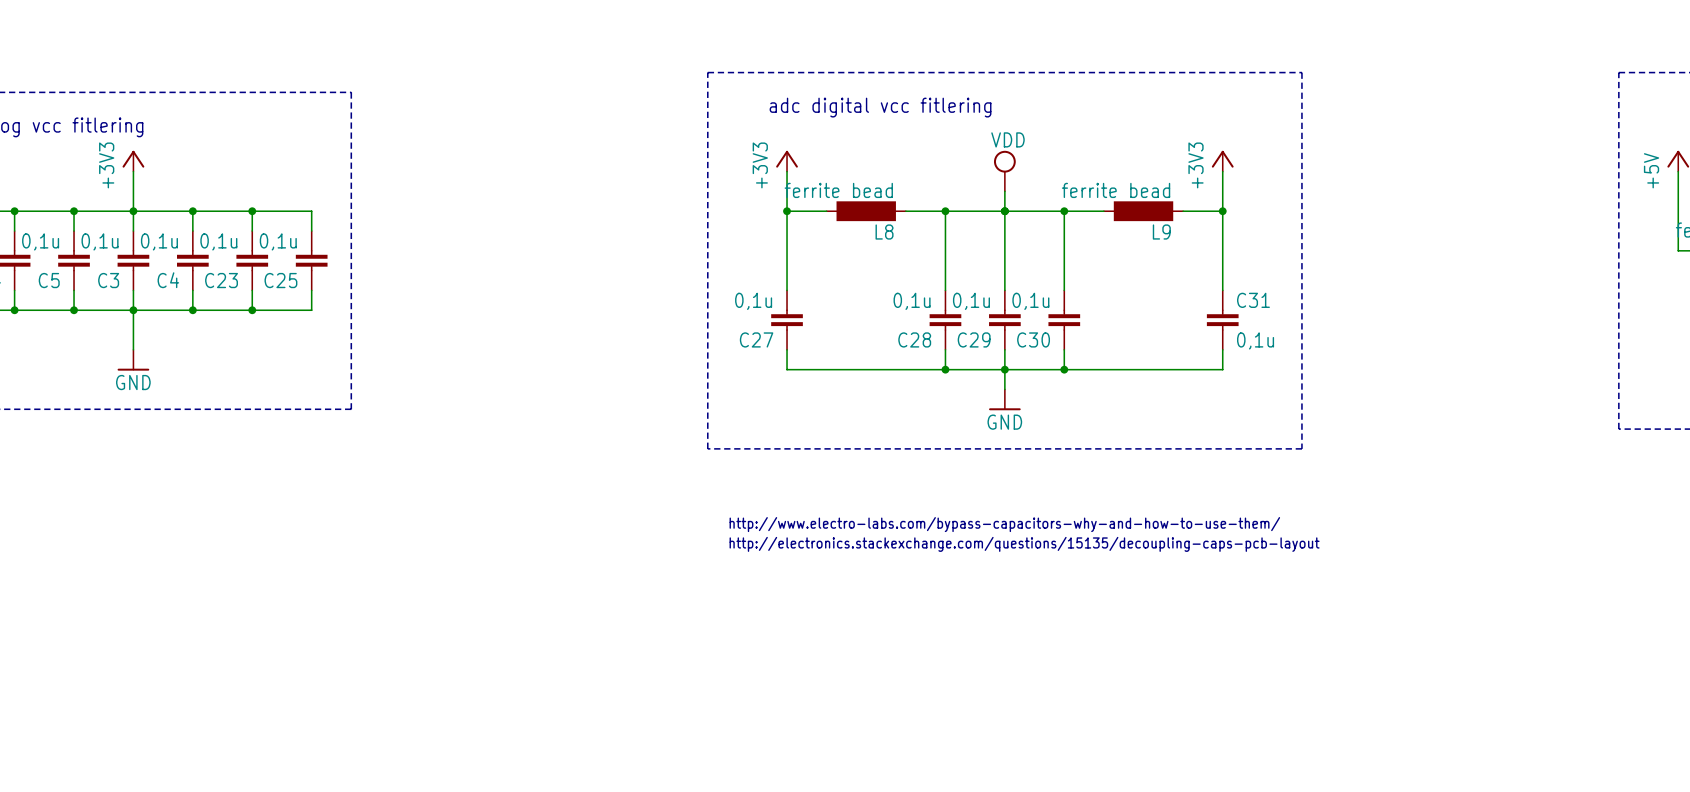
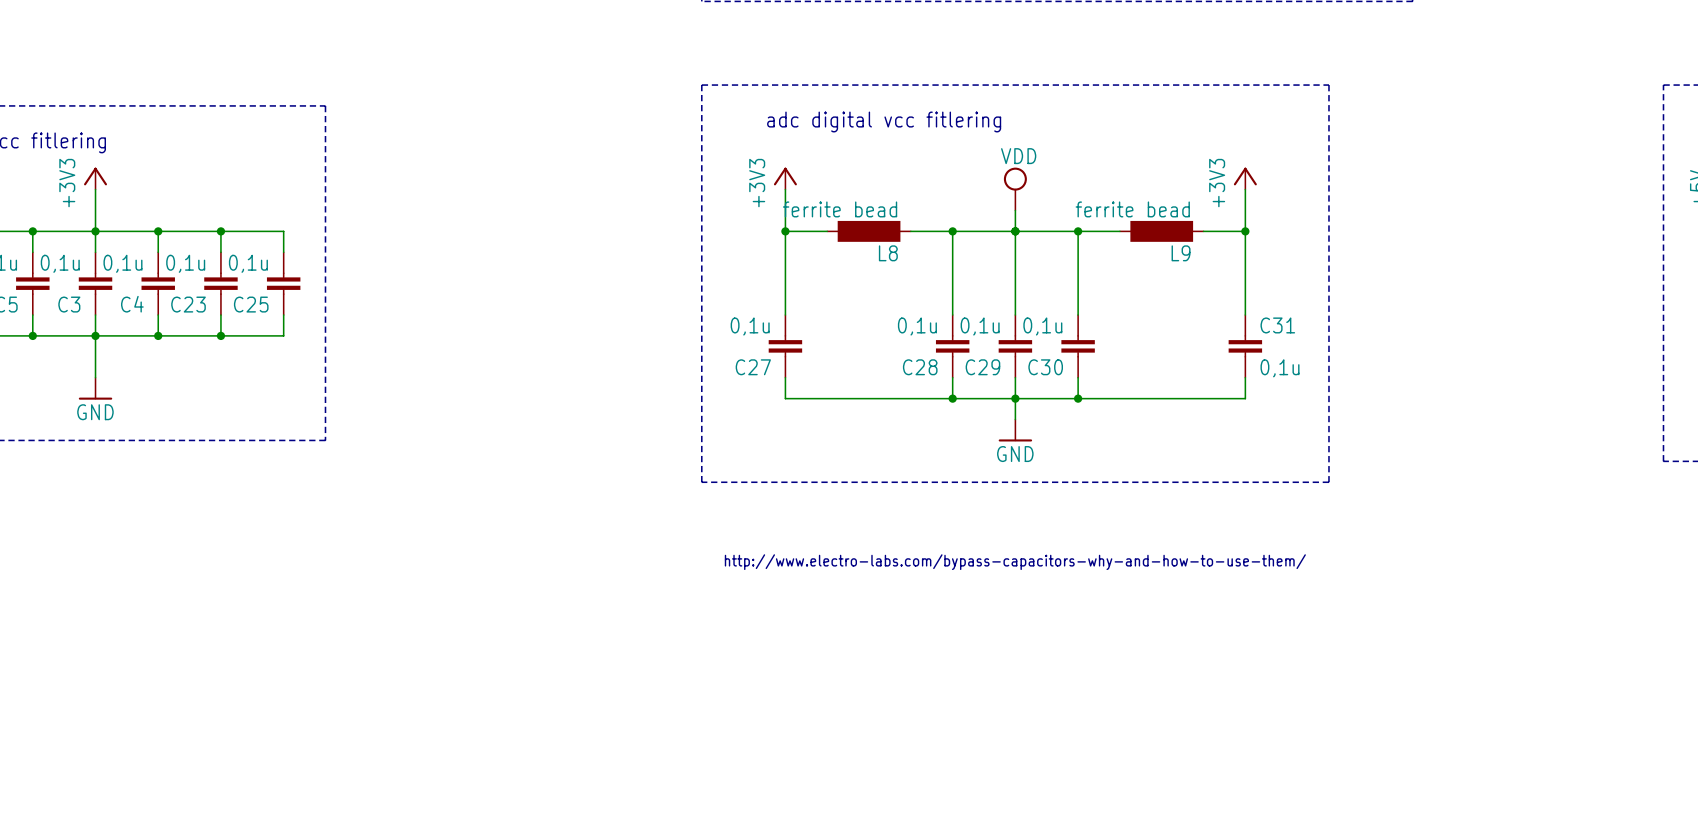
text: http://electronics.stackexchange.com/questions/15135/decoupling-caps-pcb-layout (1024, 544) -> none

